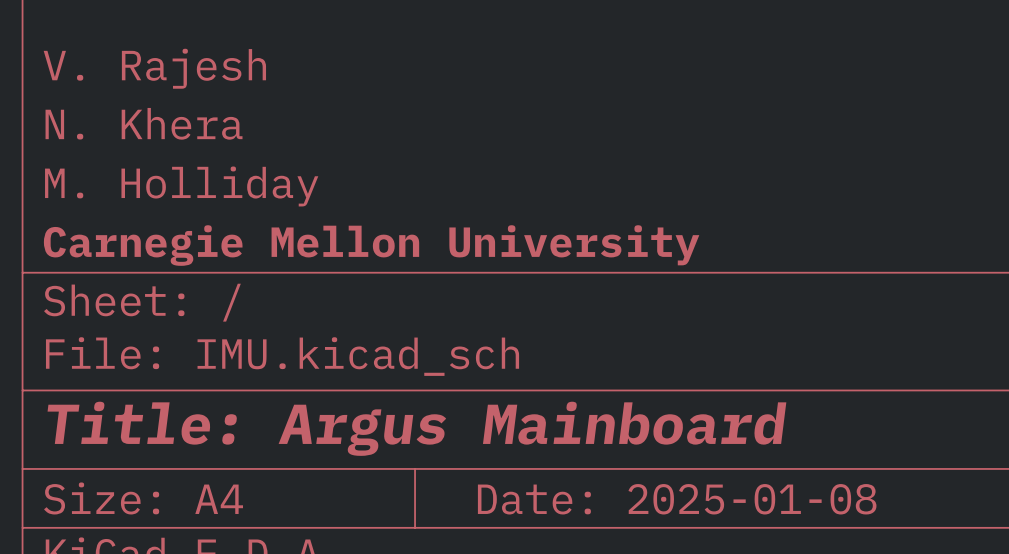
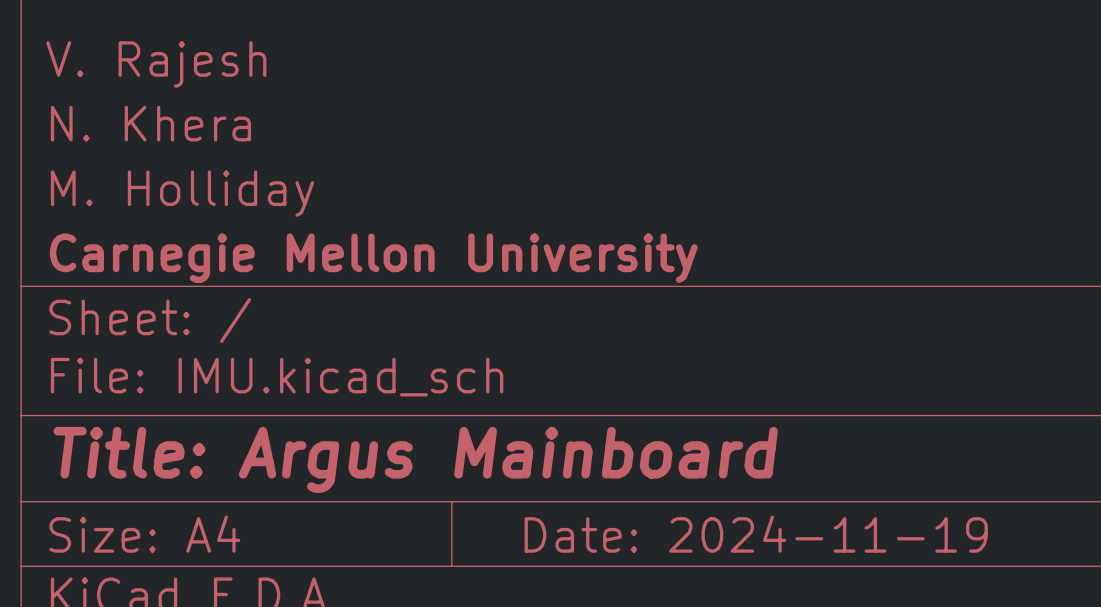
title block: Date: 2025-01-08 (677, 499) -> Date: 2024-11-19 (756, 534)

